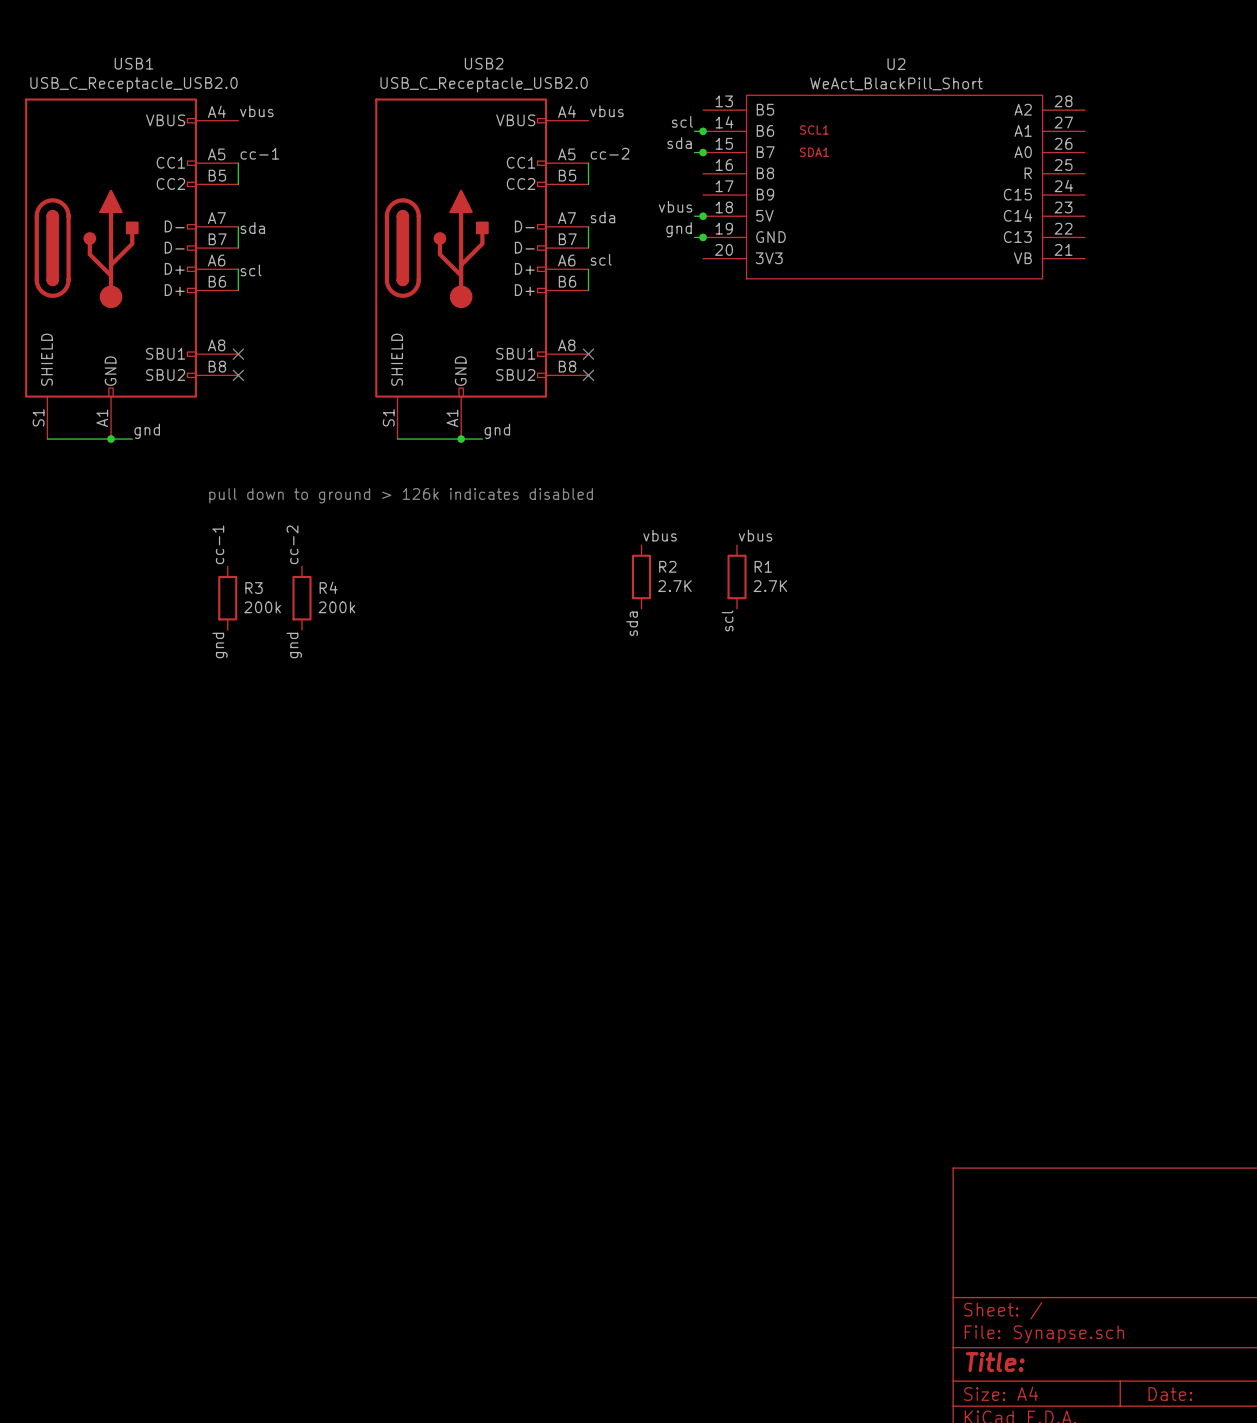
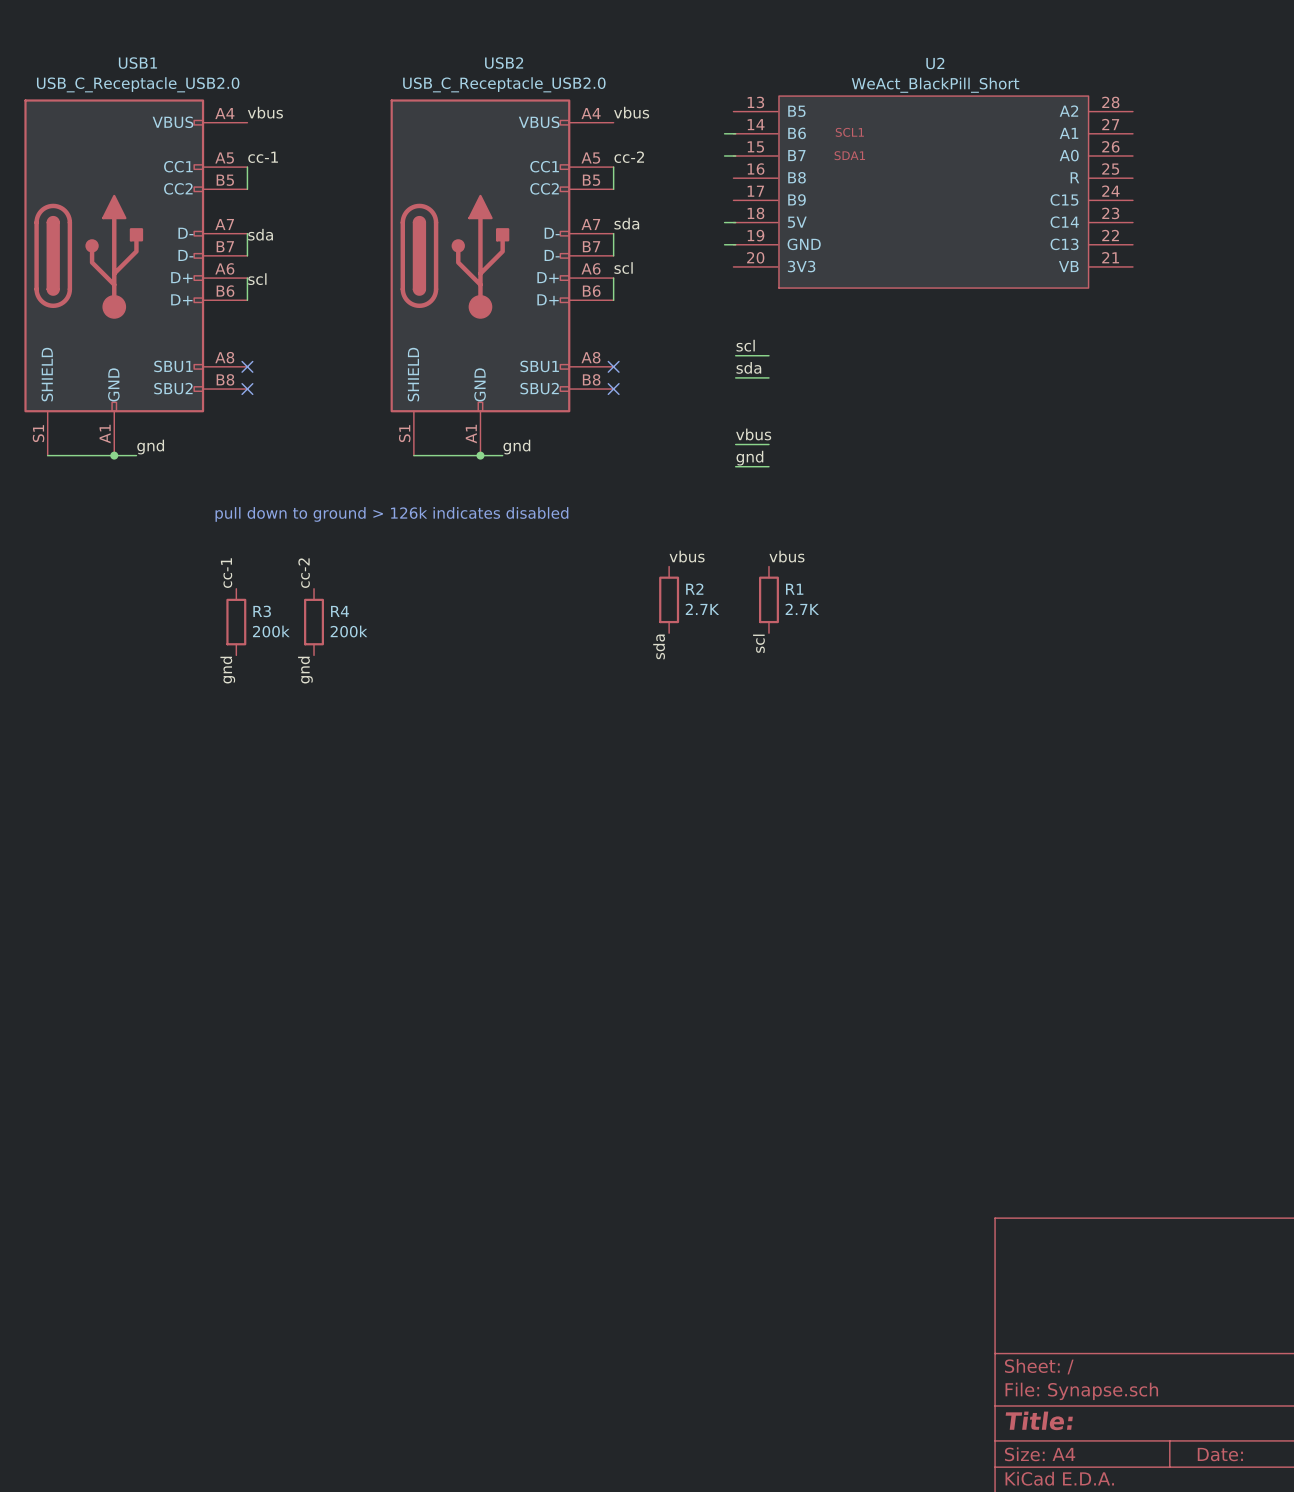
label: scl (682, 121) -> none
junction: (703, 131) -> none
label: sda (679, 143) -> none
junction: (703, 152) -> none
label: vbus (675, 206) -> none
junction: (703, 216) -> none
label: gnd (679, 229) -> none
junction: (703, 237) -> none
label: none -> scl (745, 345)
wire: none -> (735, 355) (768, 355)
label: none -> sda (748, 367)
wire: none -> (735, 377) (768, 377)
label: none -> vbus (753, 434)
wire: none -> (735, 444) (768, 444)
label: none -> gnd (749, 458)
wire: none -> (735, 466) (768, 466)

